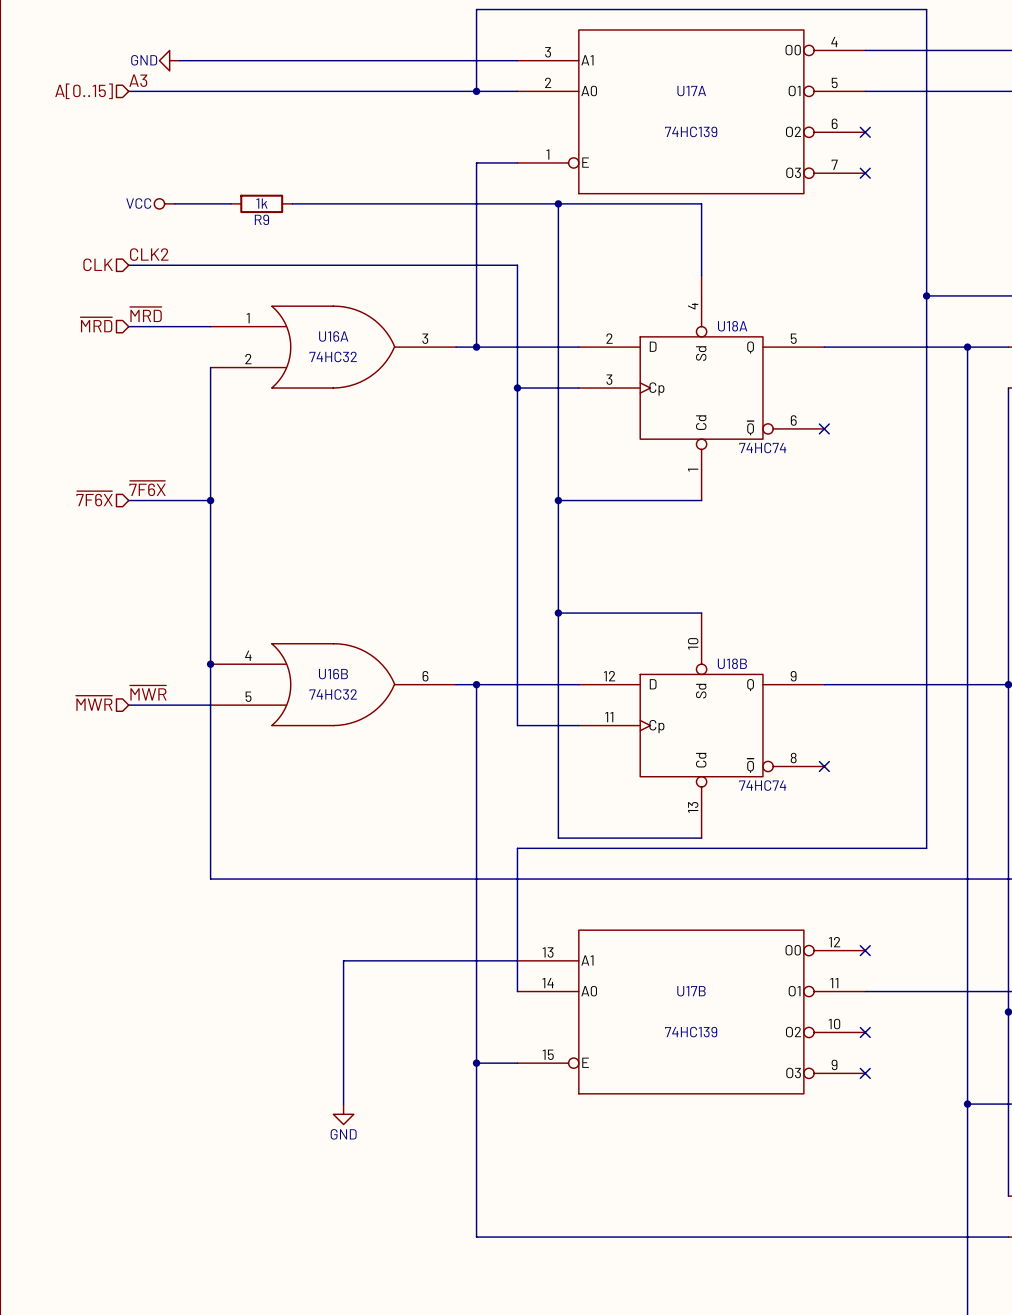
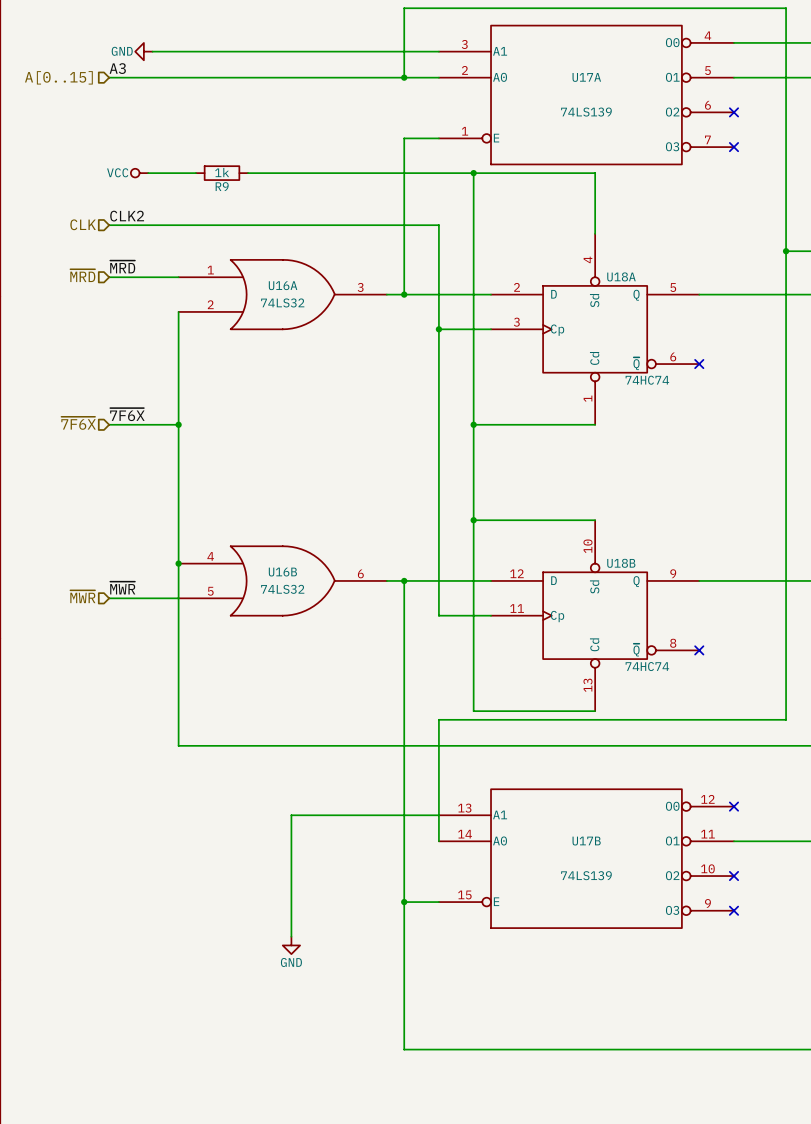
U17A value: 74HC139 (691, 131) -> 74LS139 (586, 112)
U16A value: 74HC32 (333, 356) -> 74LS32 (282, 302)
U16B value: 74HC32 (333, 694) -> 74LS32 (282, 589)
U17B value: 74HC139 (691, 1032) -> 74LS139 (586, 875)

